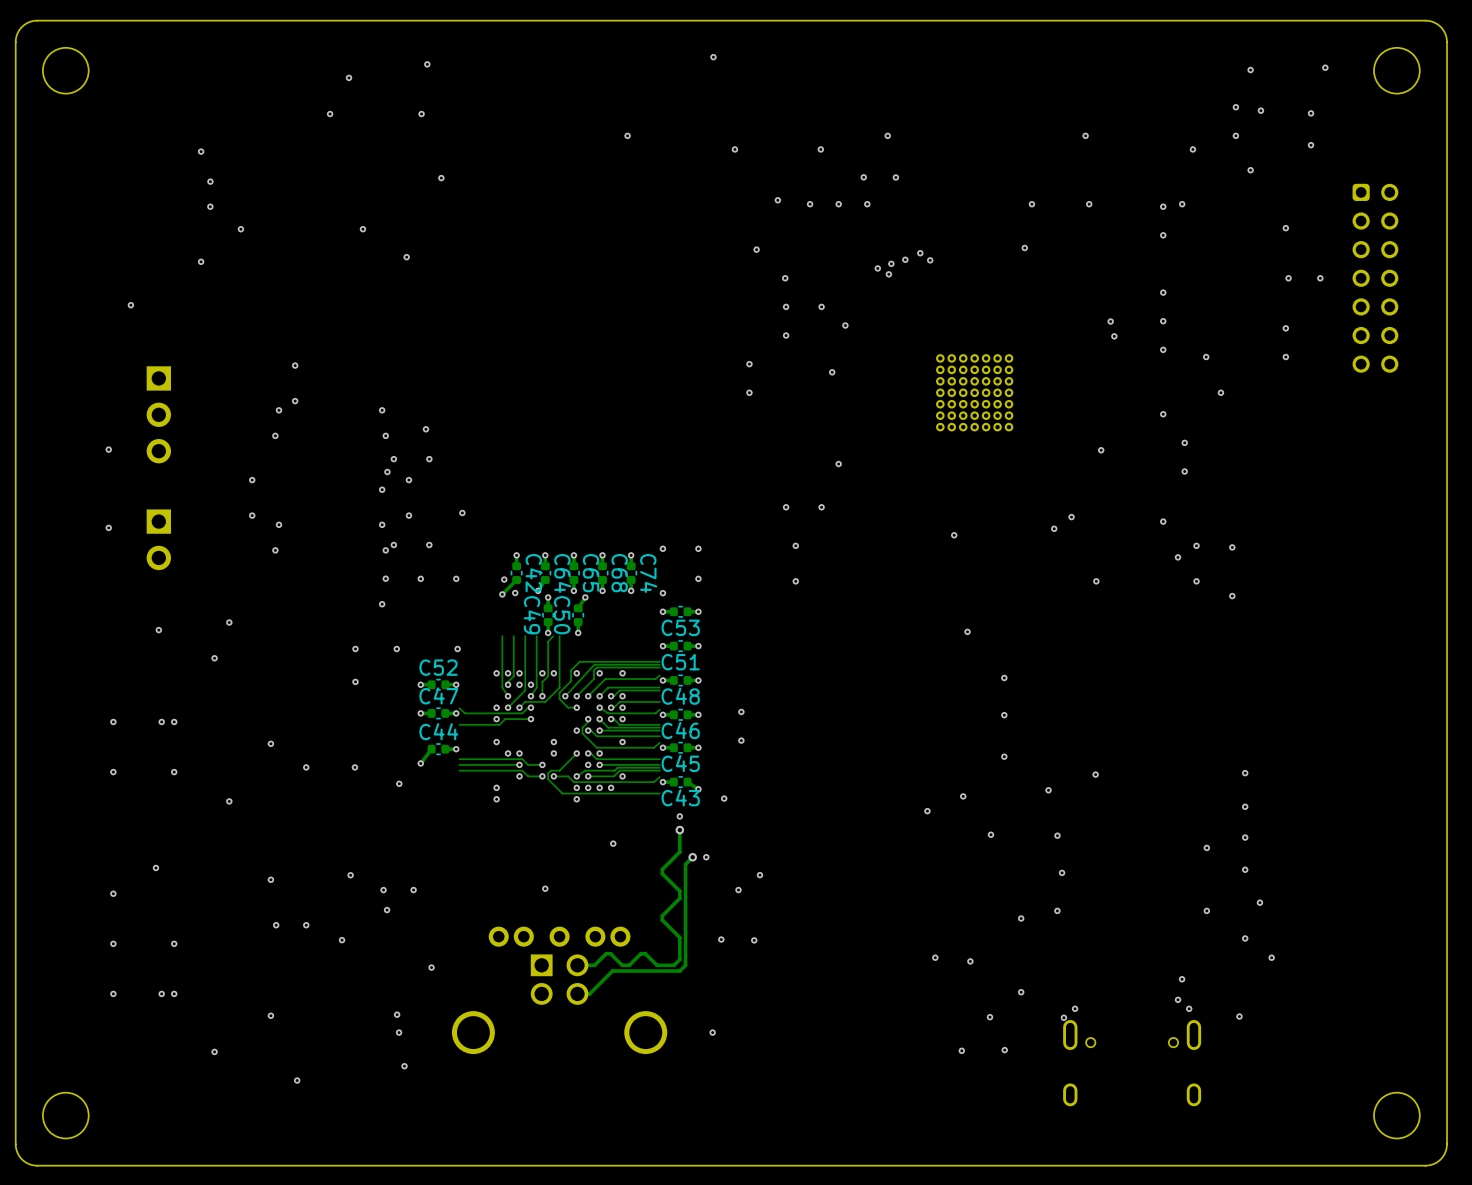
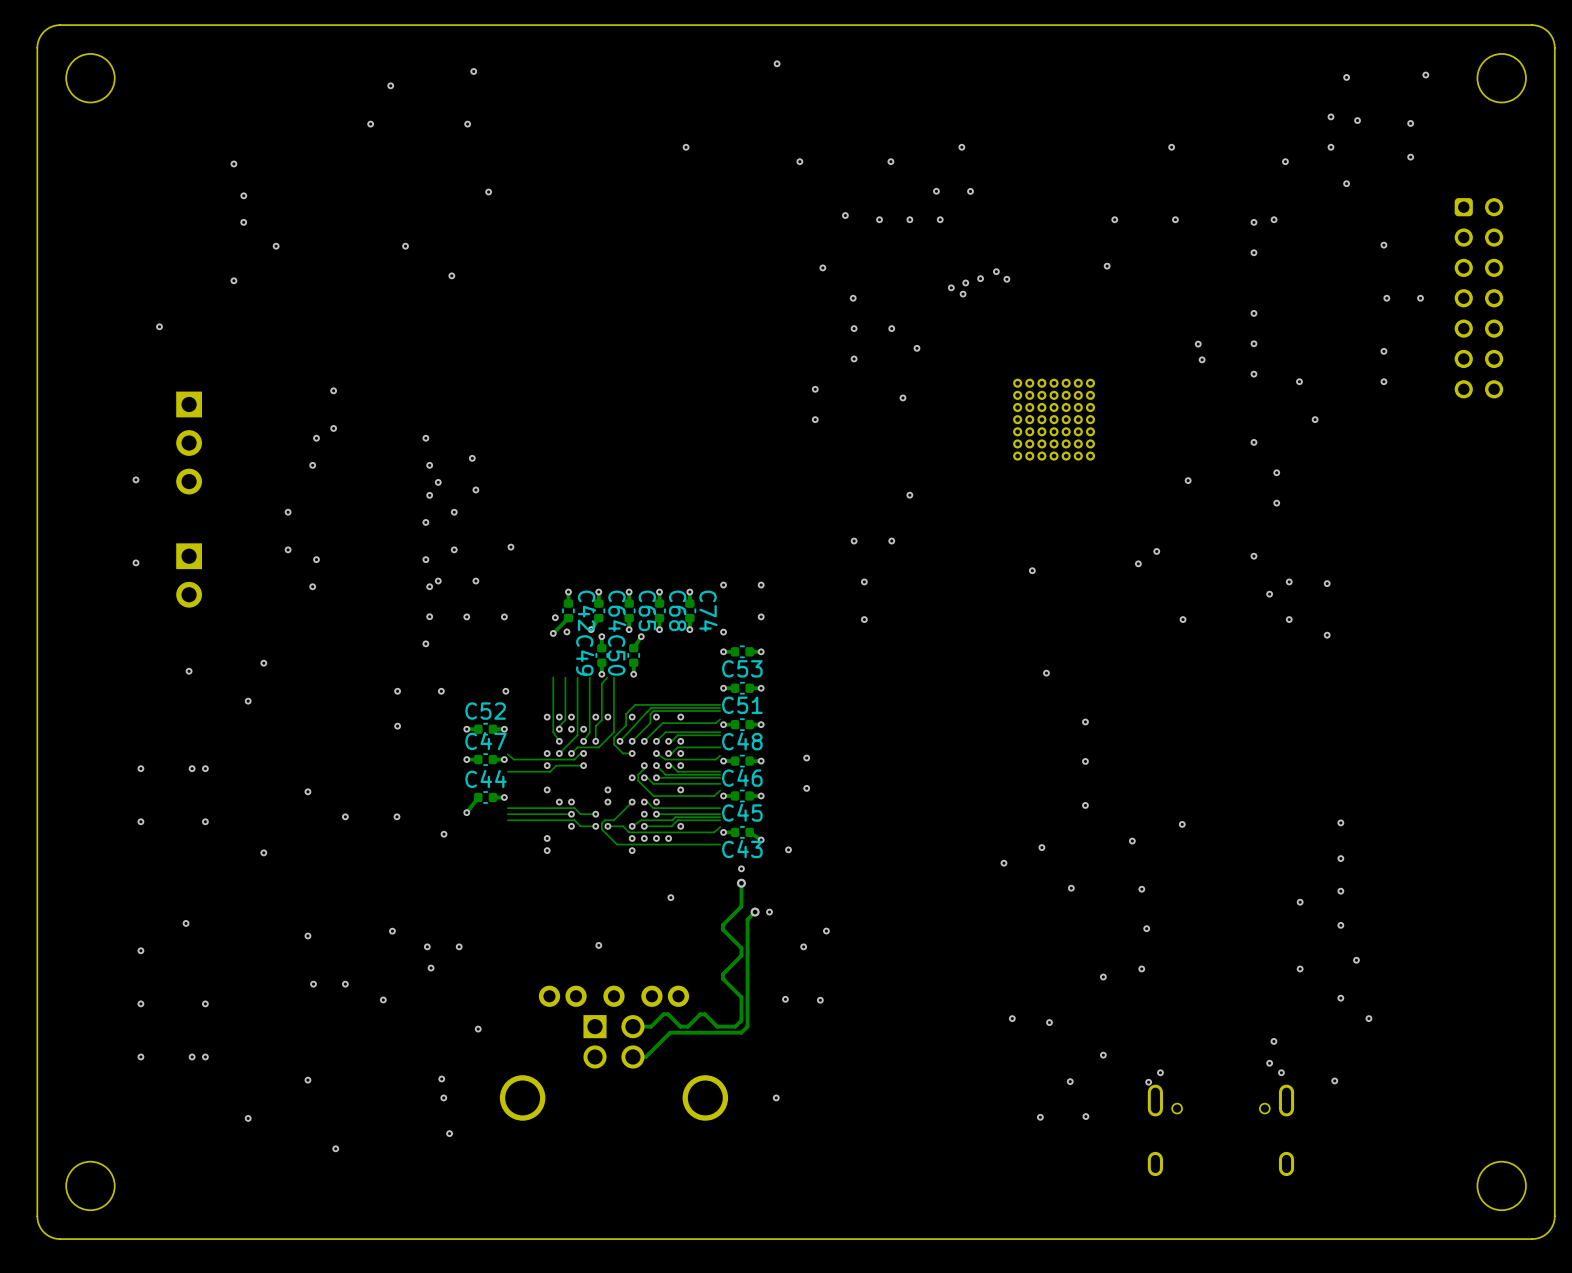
via: none -> (438, 482)
via: (393, 459) -> none
via: none -> (429, 495)
via: (387, 472) -> none

